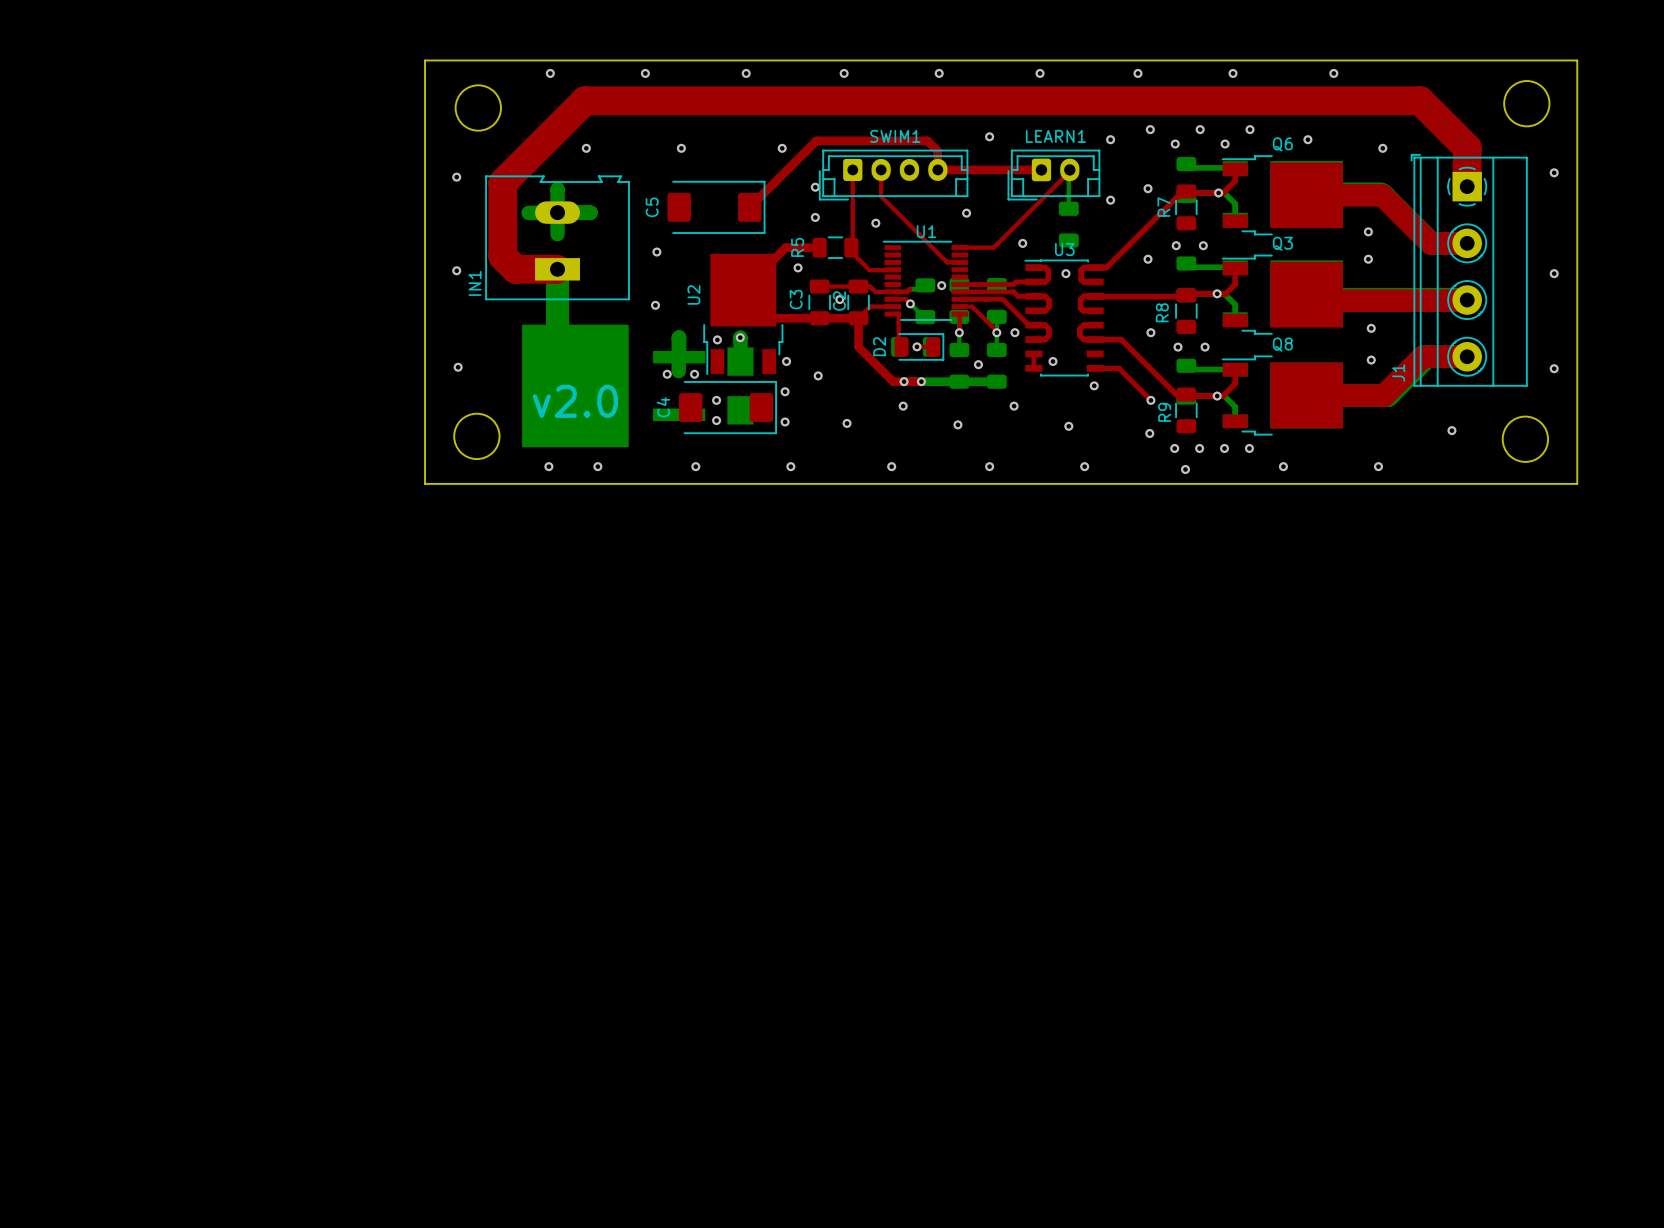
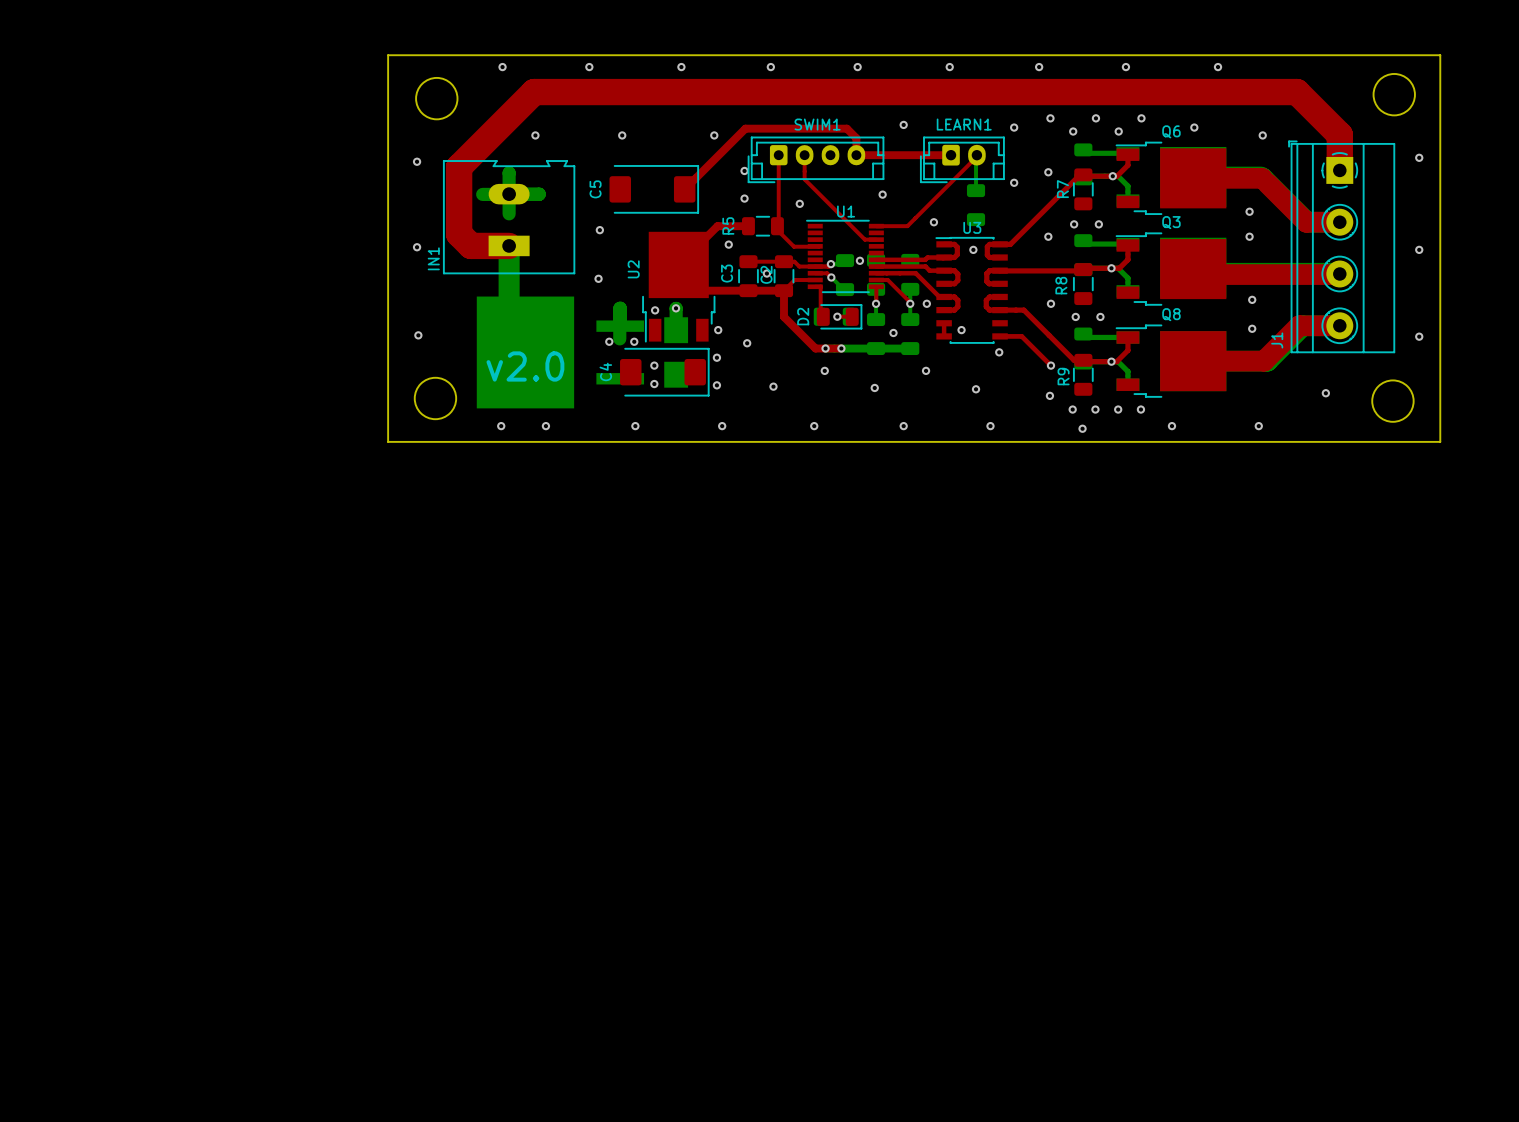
via: none -> (830, 264)

